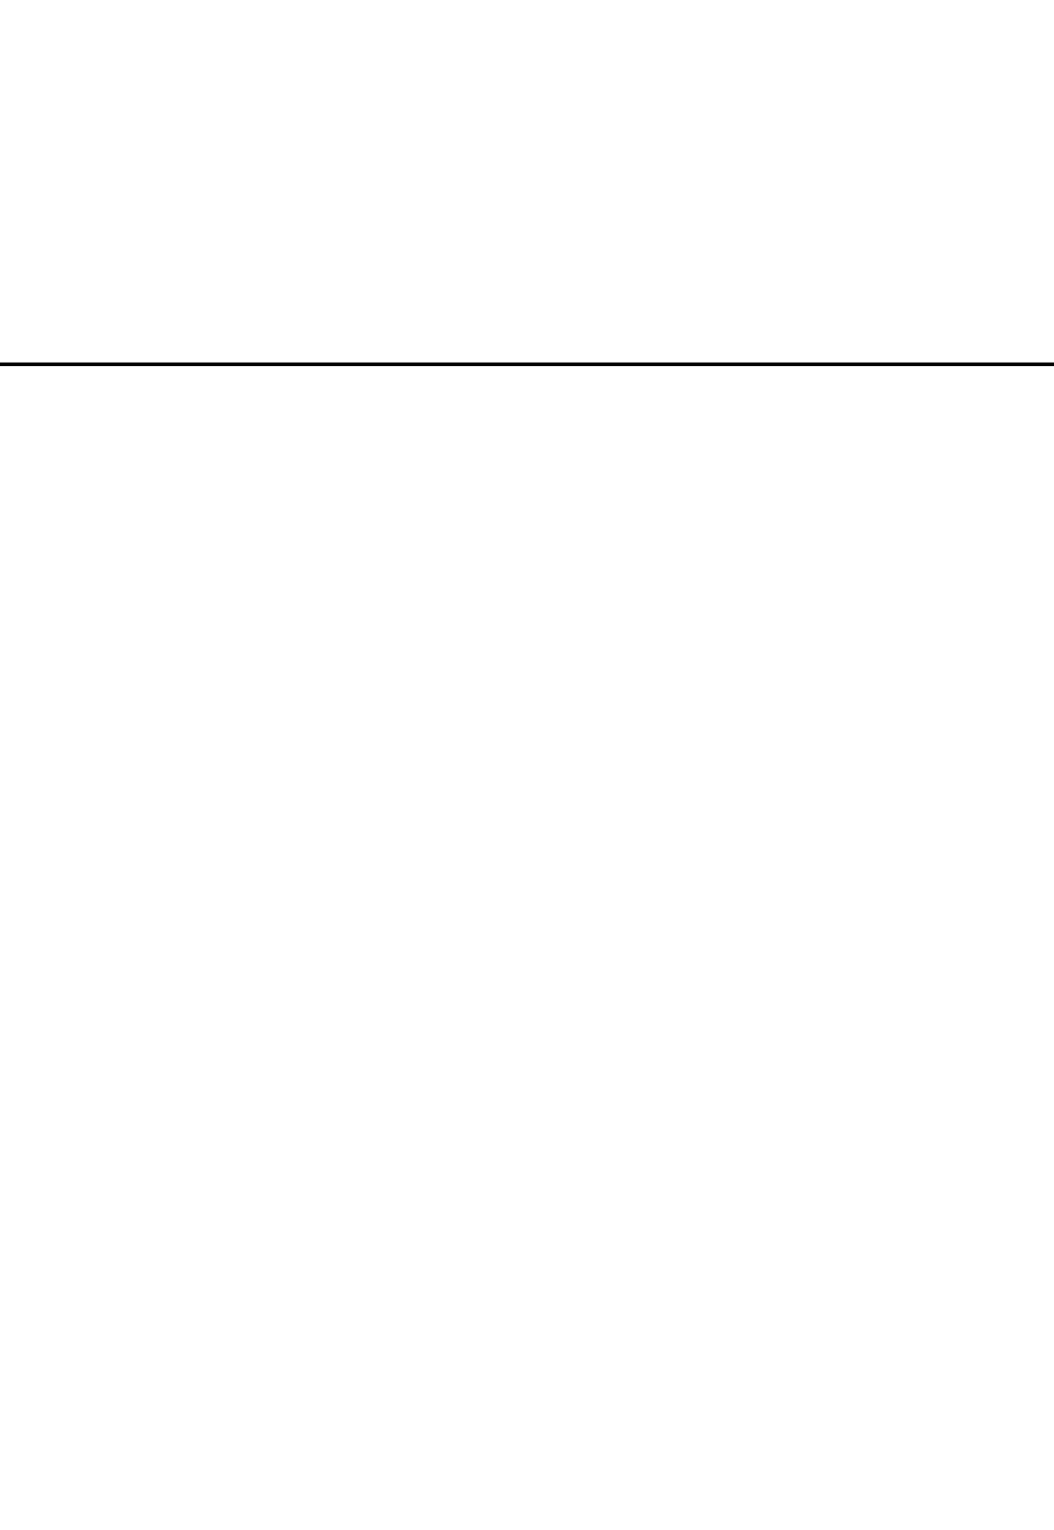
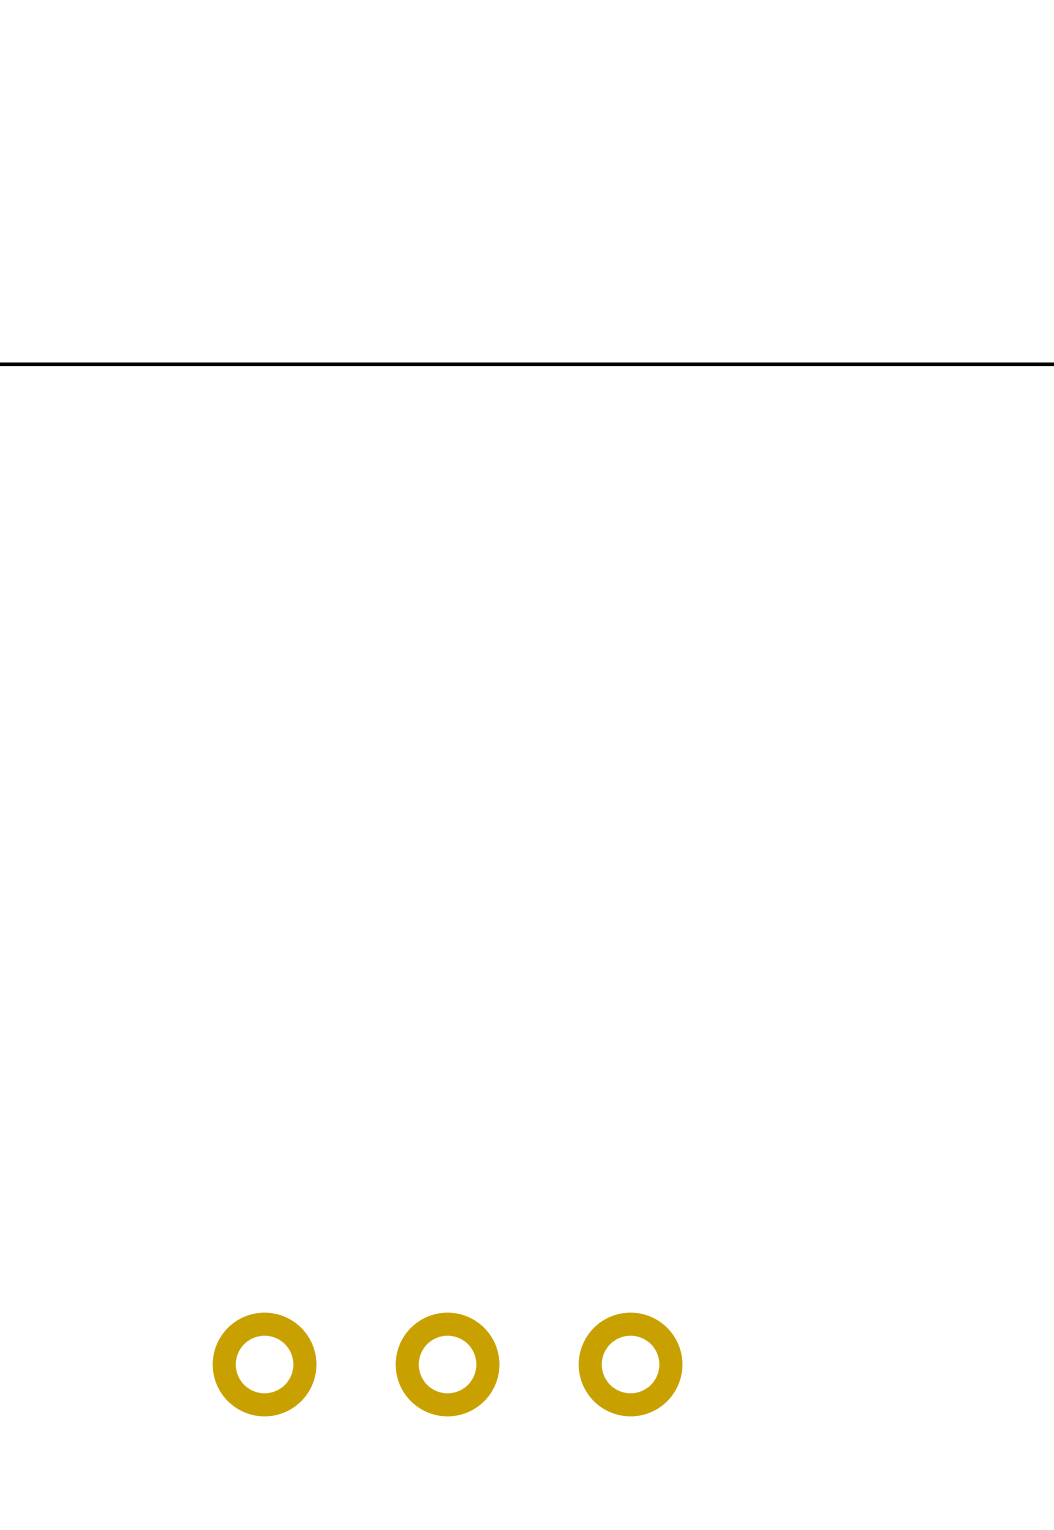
part: none -> (447, 1364)

